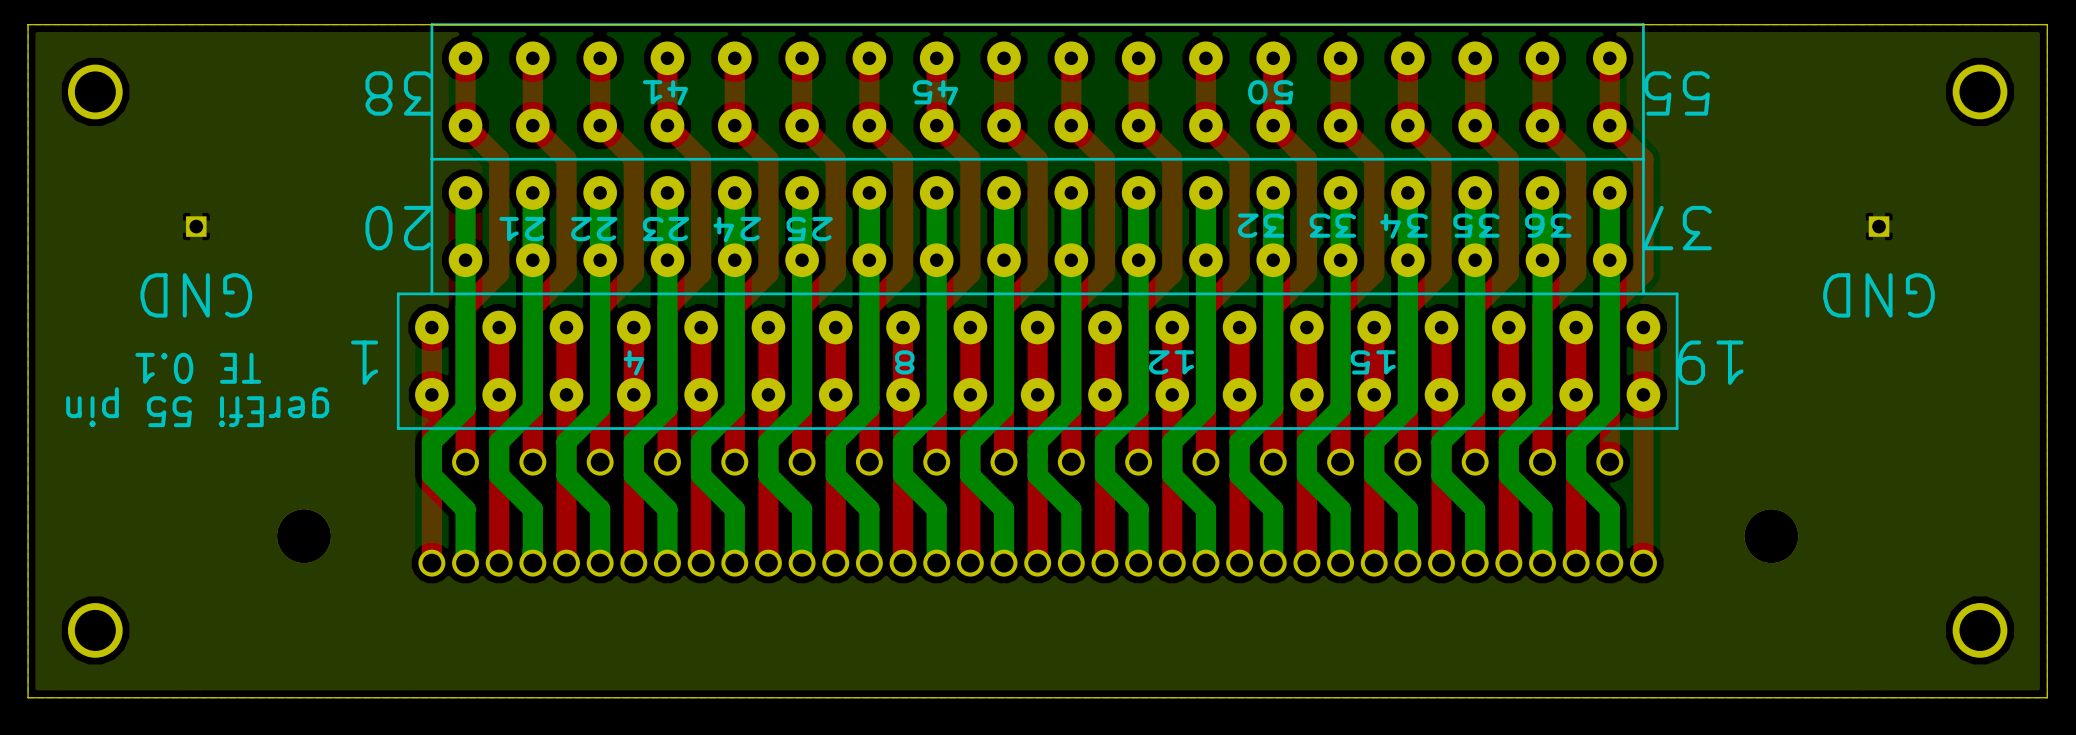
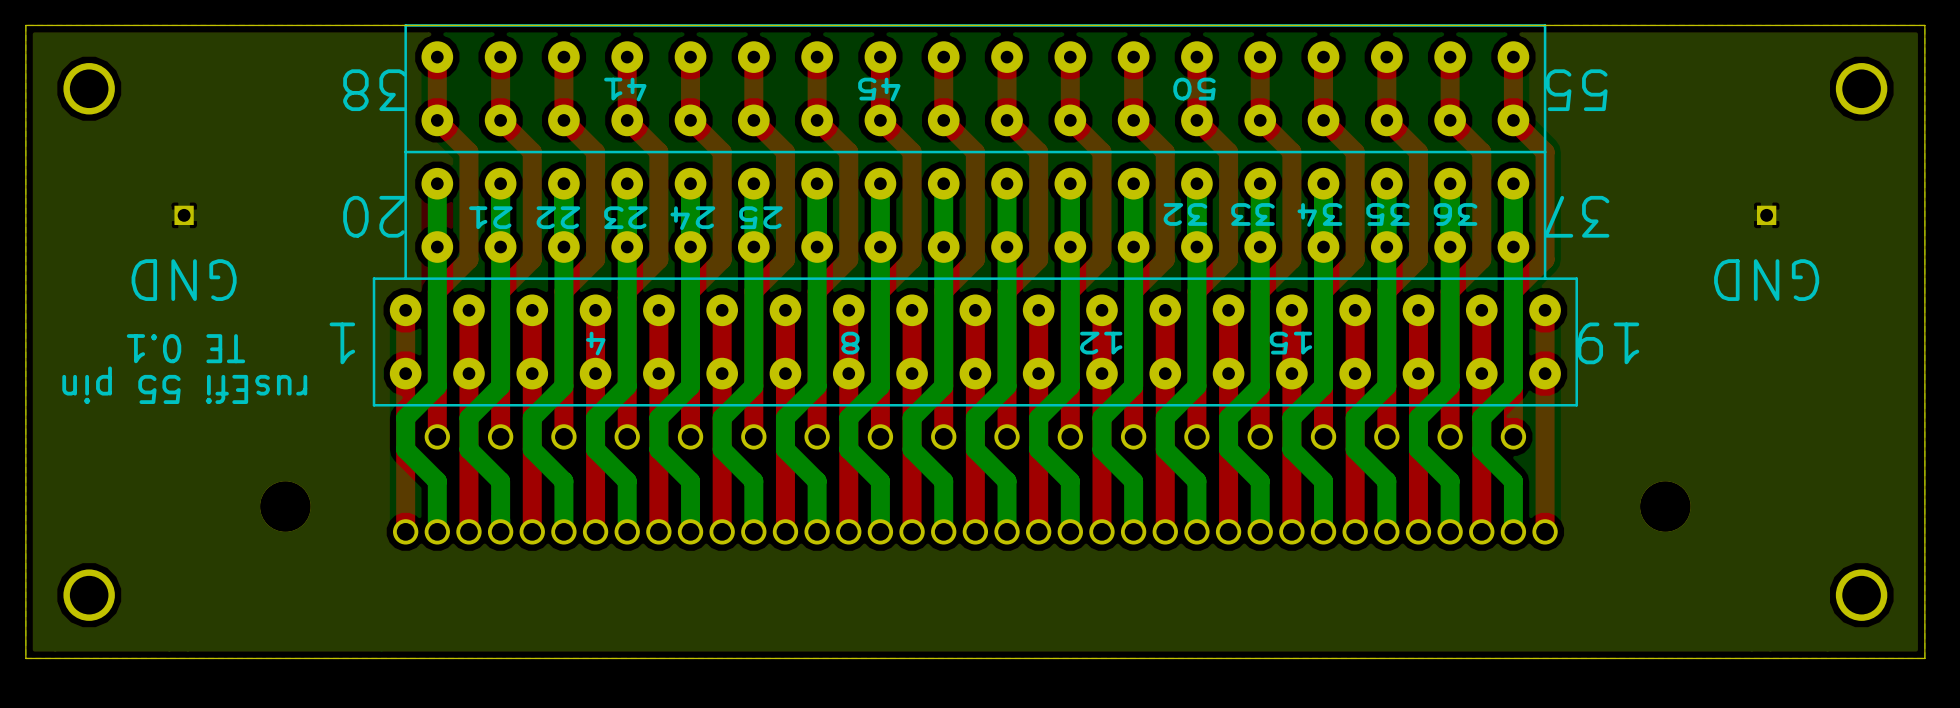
text: gerEfi 55 pin (197, 407) -> rusEfi 55 pin (184, 385)

